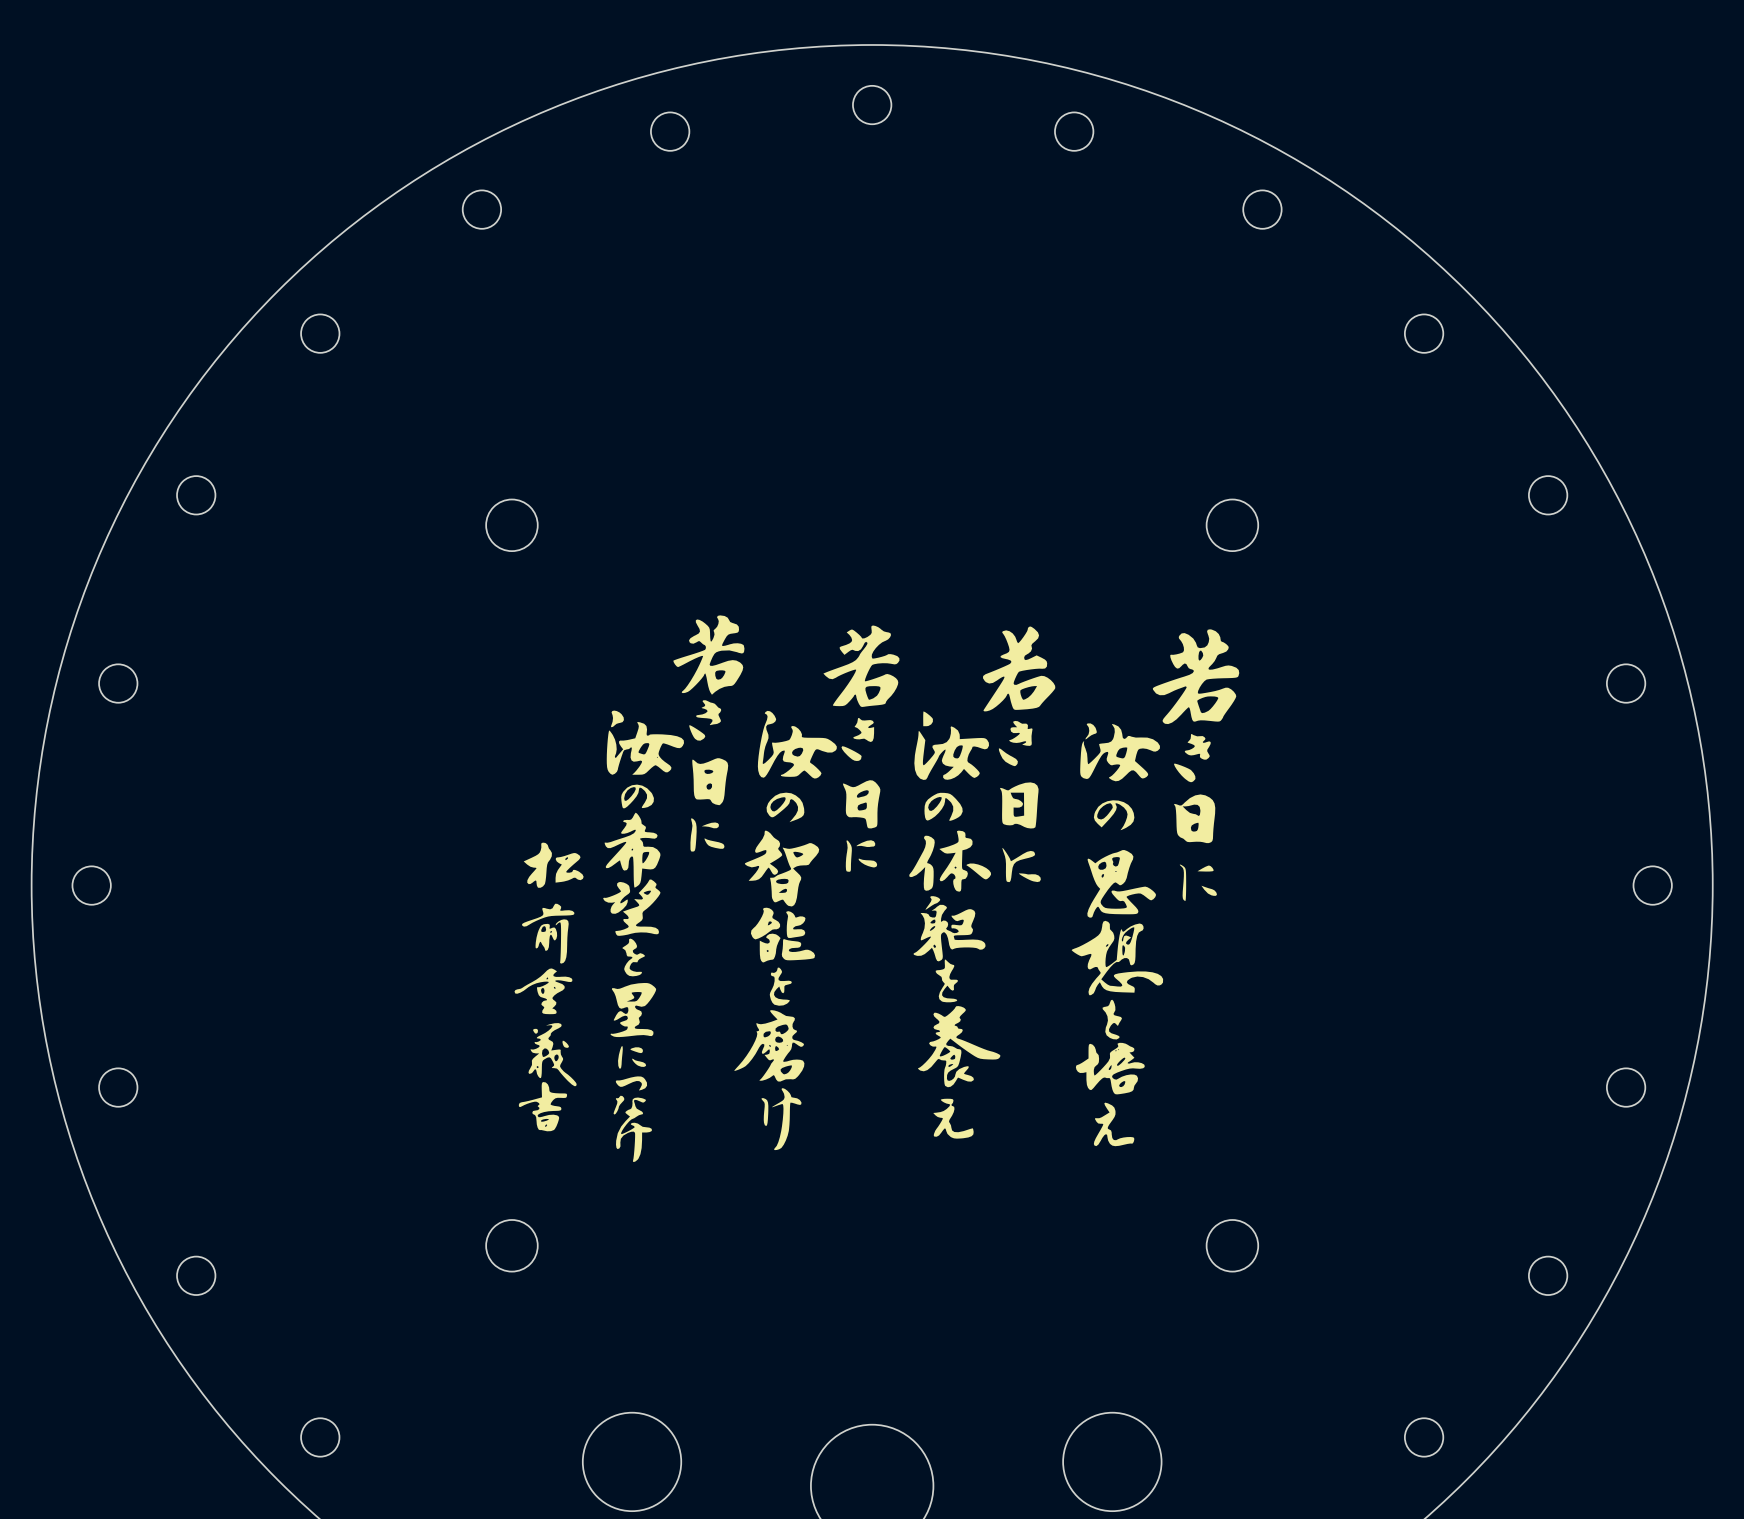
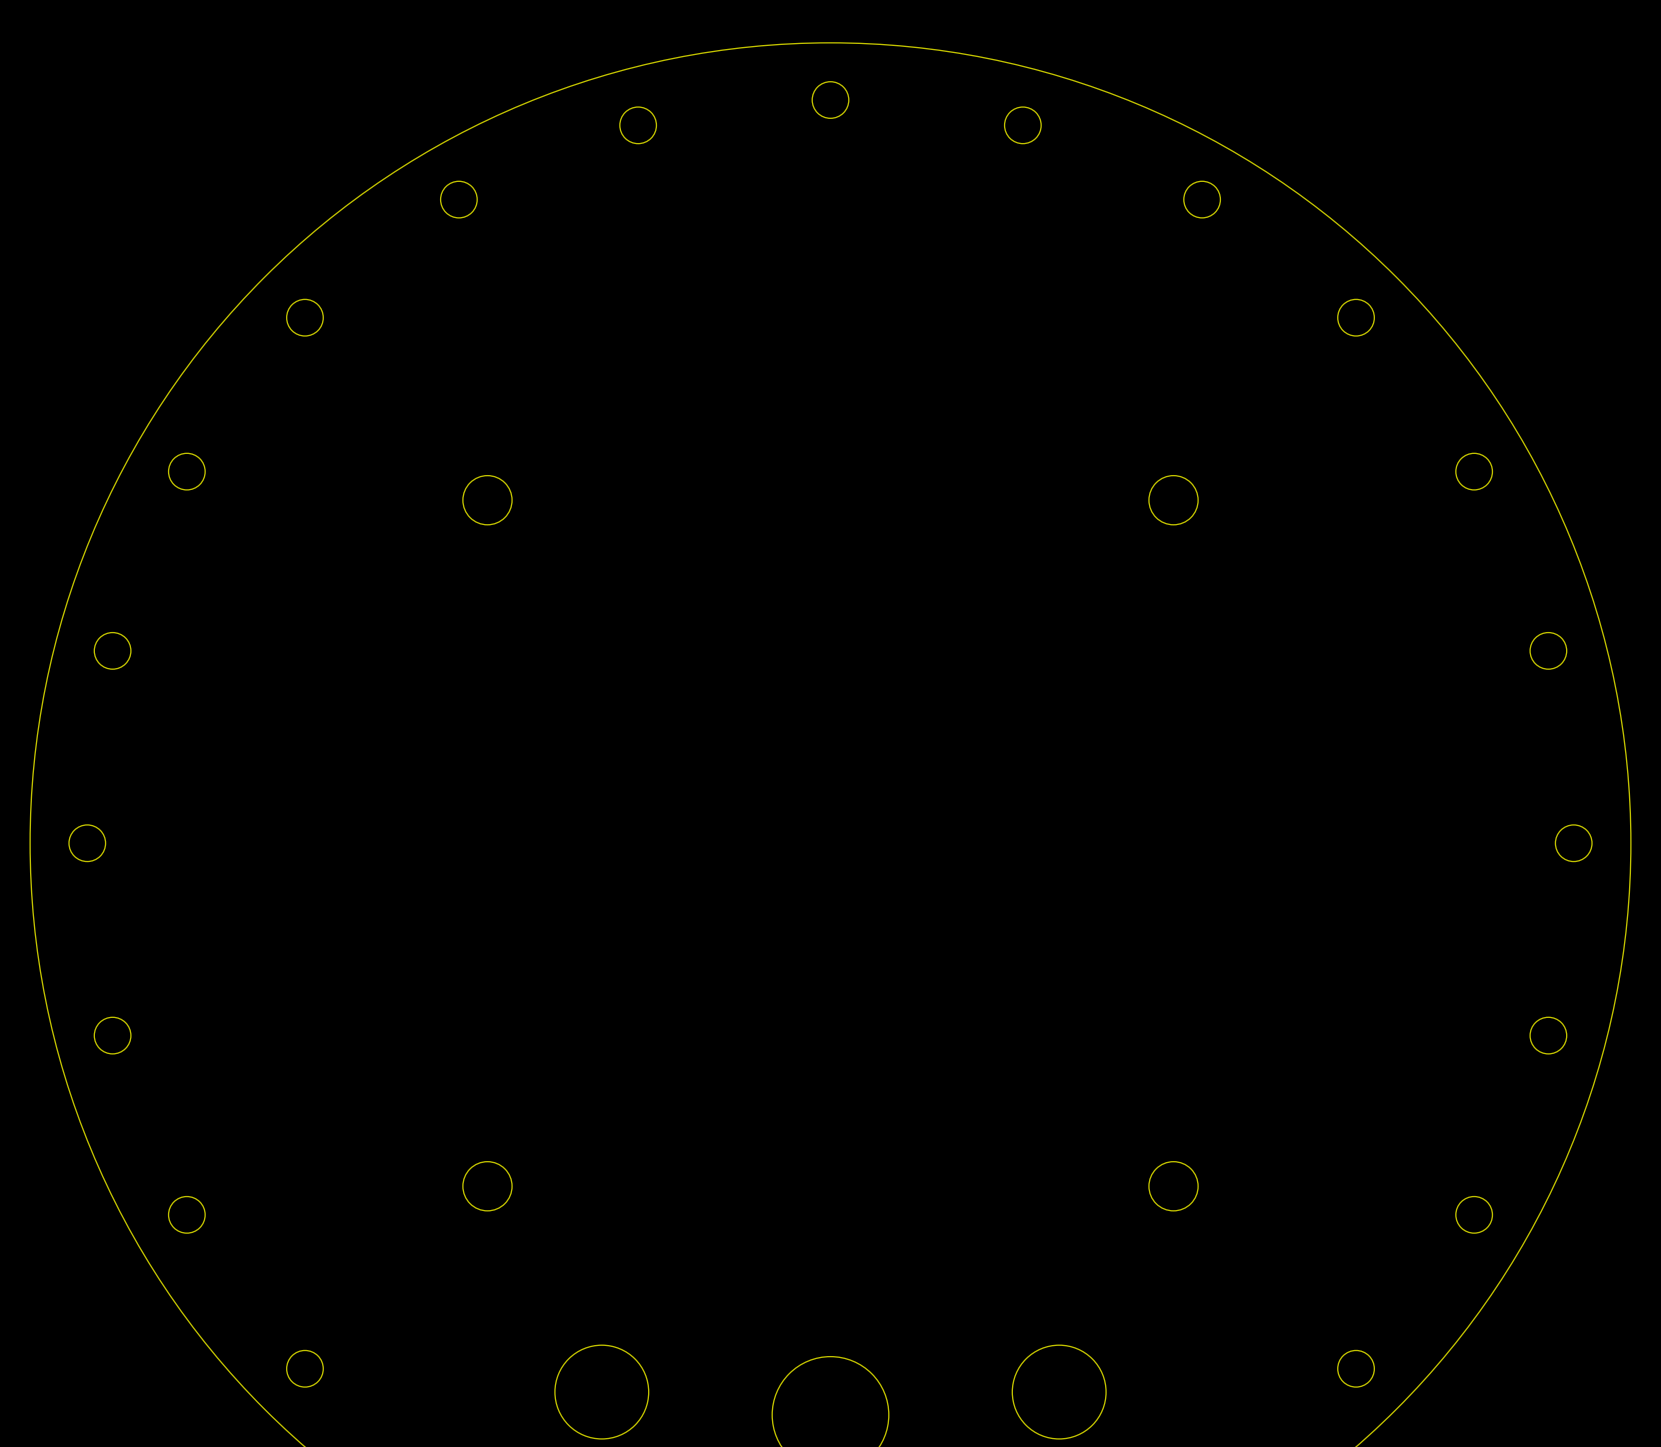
drawing: [514, 615, 1240, 1163] -> none

